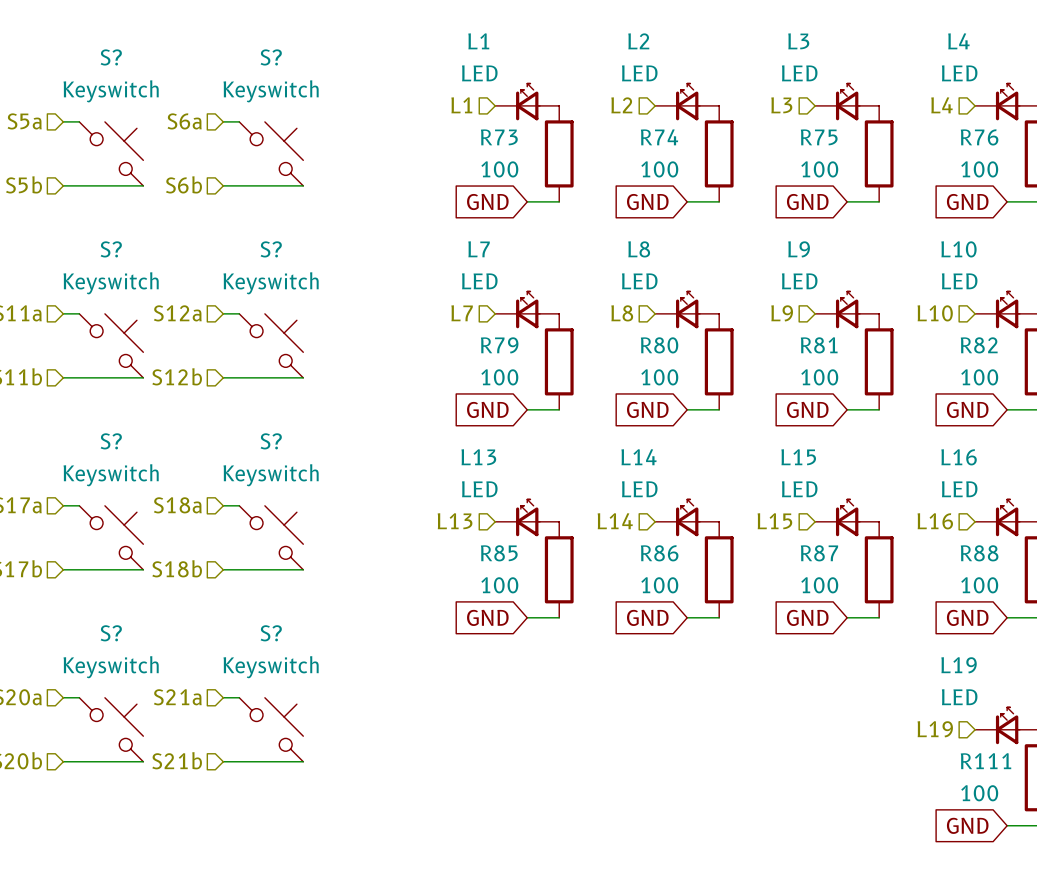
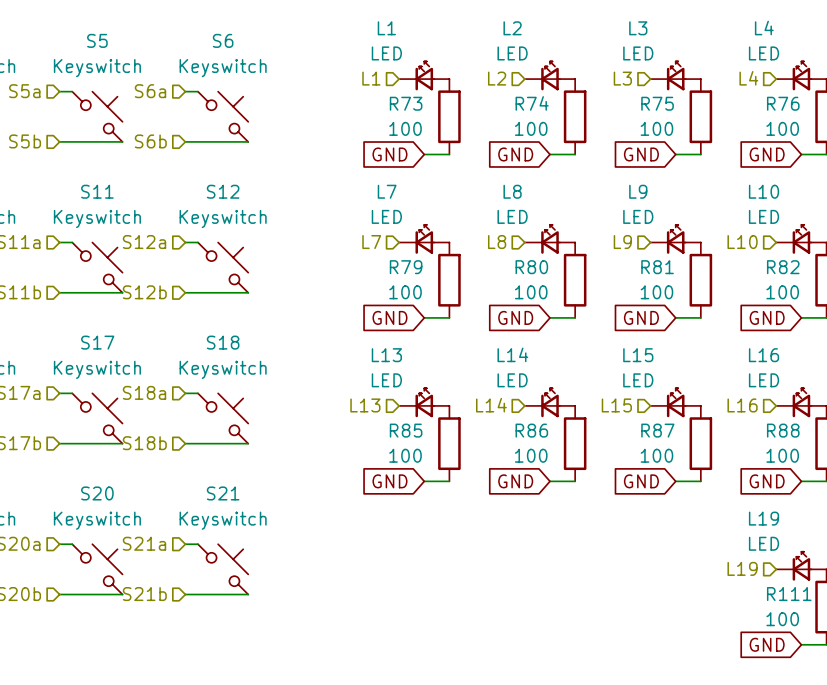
S? name: S? (111, 57) -> S5 (97, 40)
S? name: S? (271, 57) -> S6 (223, 40)
S? name: S? (111, 249) -> S11 (97, 191)
S? name: S? (271, 249) -> S12 (223, 191)
S? name: S? (111, 441) -> S17 (97, 342)
S? name: S? (271, 441) -> S18 (223, 342)
S? name: S? (111, 633) -> S20 (97, 493)
S? name: S? (271, 633) -> S21 (223, 493)

